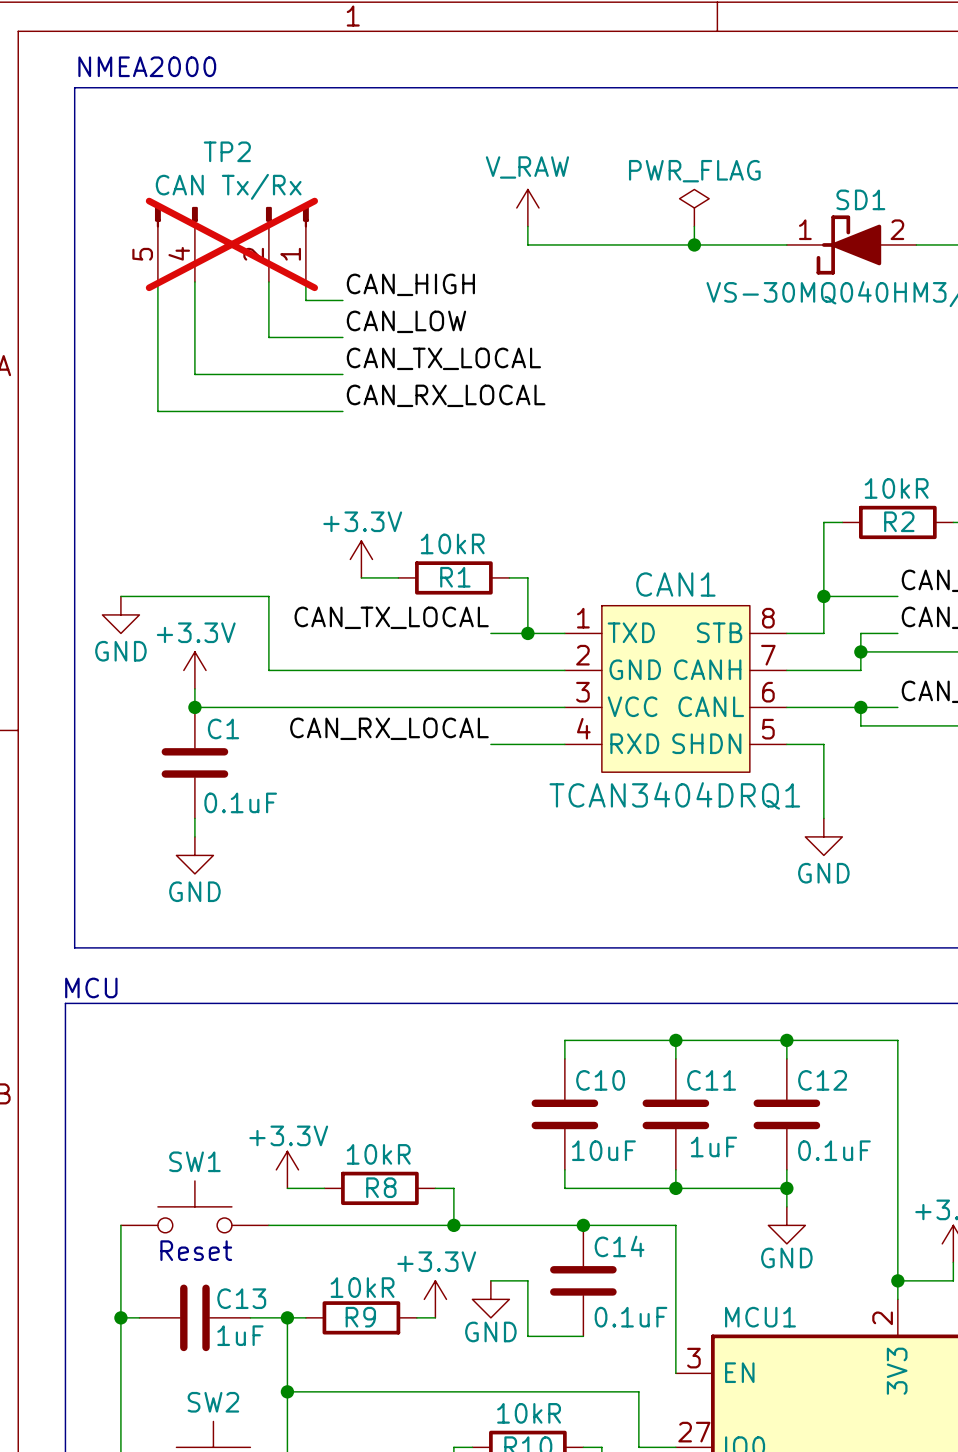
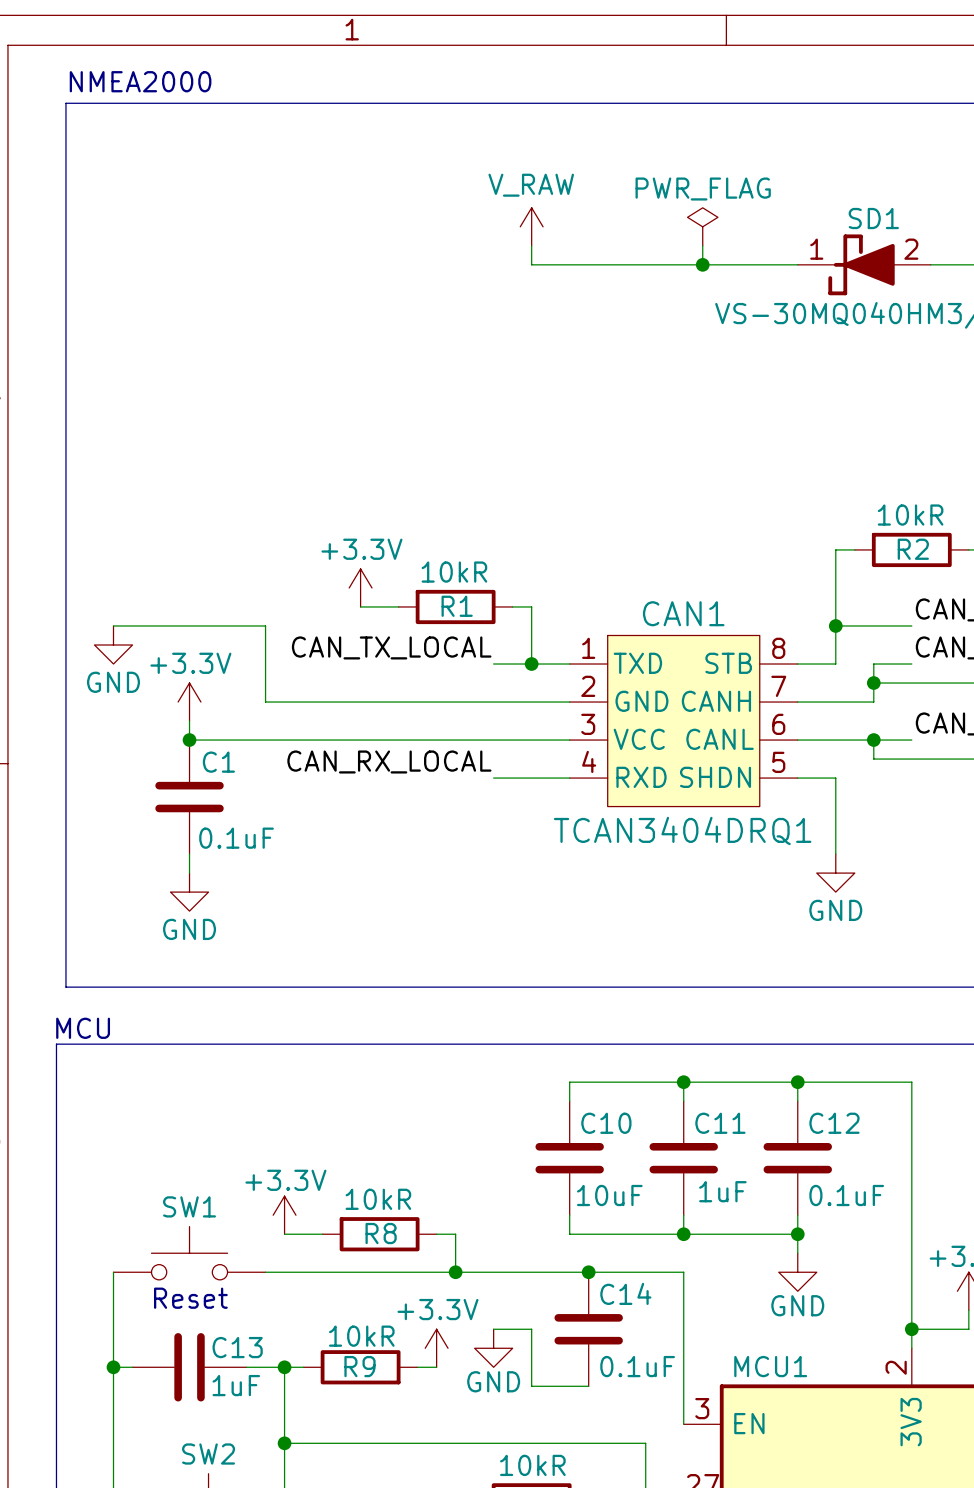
TP2: CAN Tx/Rx (231, 244) -> none
wire: (157, 281) (157, 411) (342, 411) -> none
wire: (194, 281) (194, 374) (342, 374) -> none
wire: (268, 281) (268, 337) (342, 337) -> none
wire: (305, 281) (305, 300) (342, 300) -> none
label: CAN_HIGH (410, 284) -> none
label: CAN_LOW (406, 321) -> none
label: CAN_TX_LOCAL (443, 358) -> none
label: CAN_RX_LOCAL (446, 395) -> none

